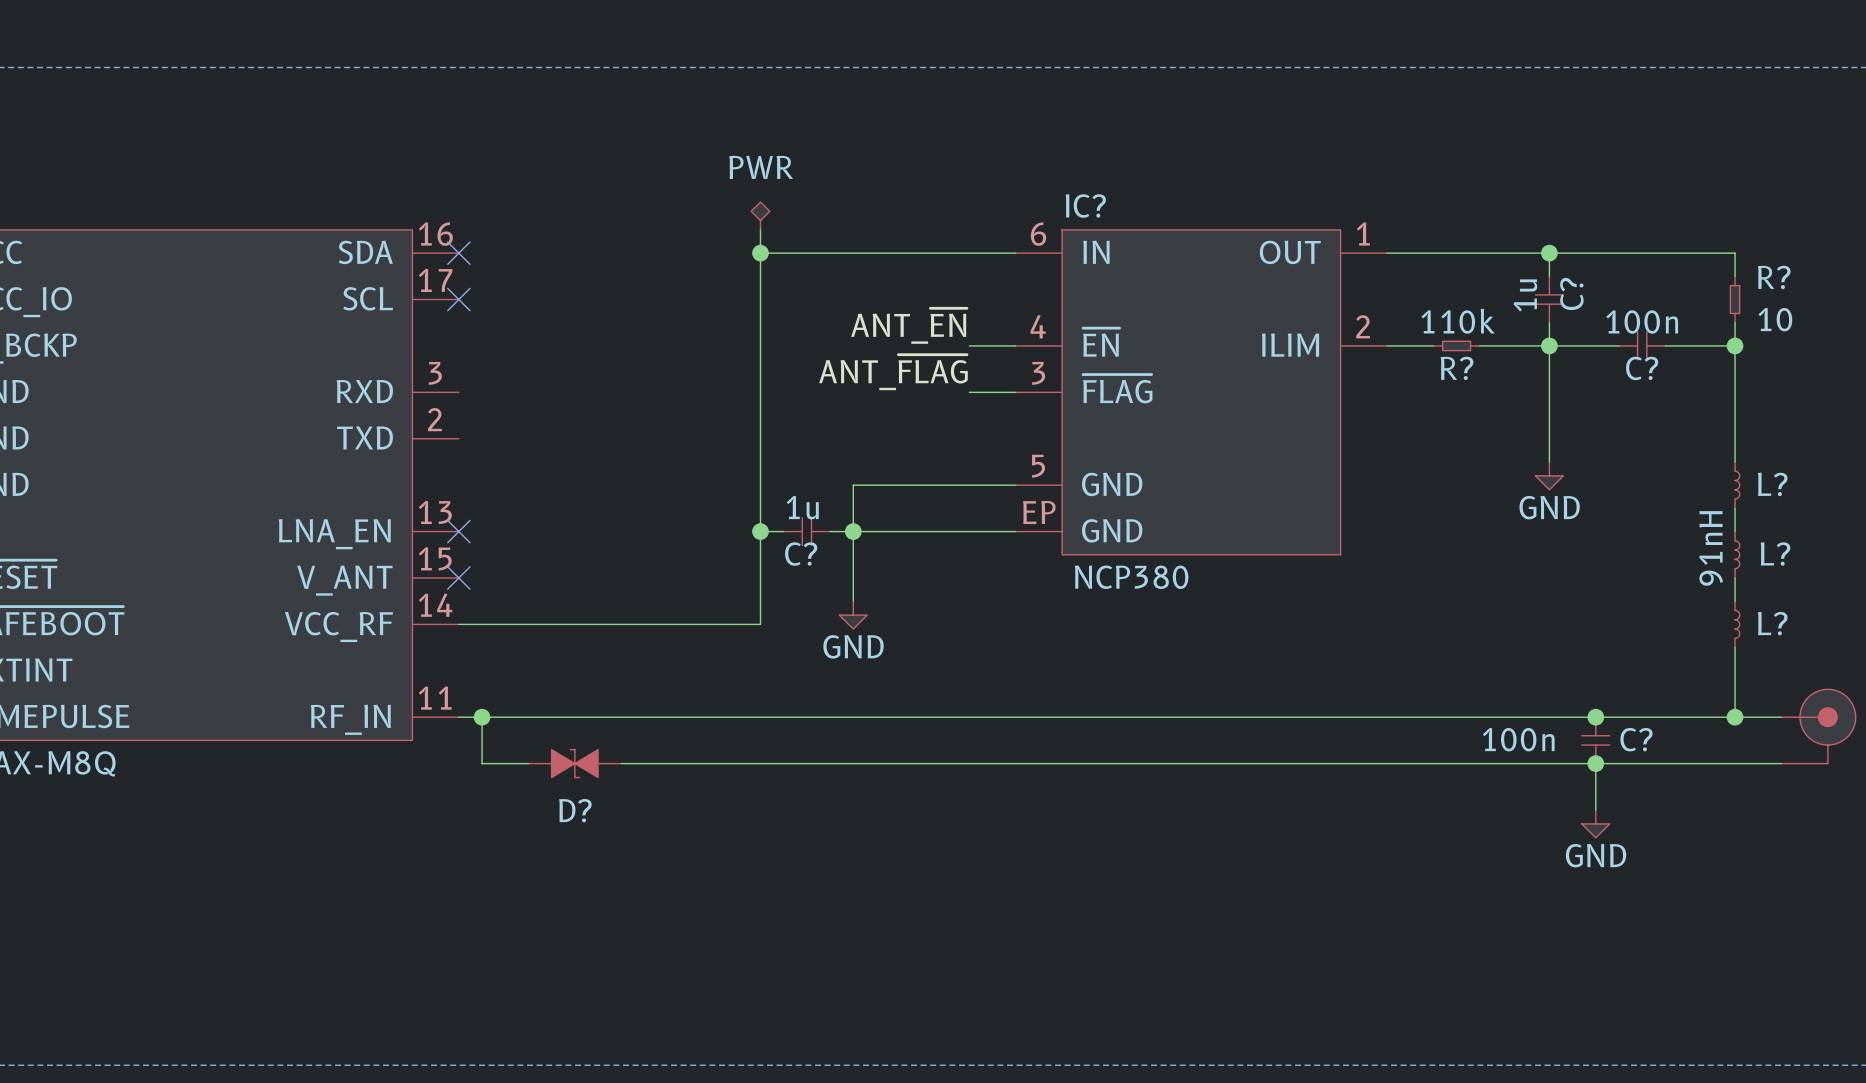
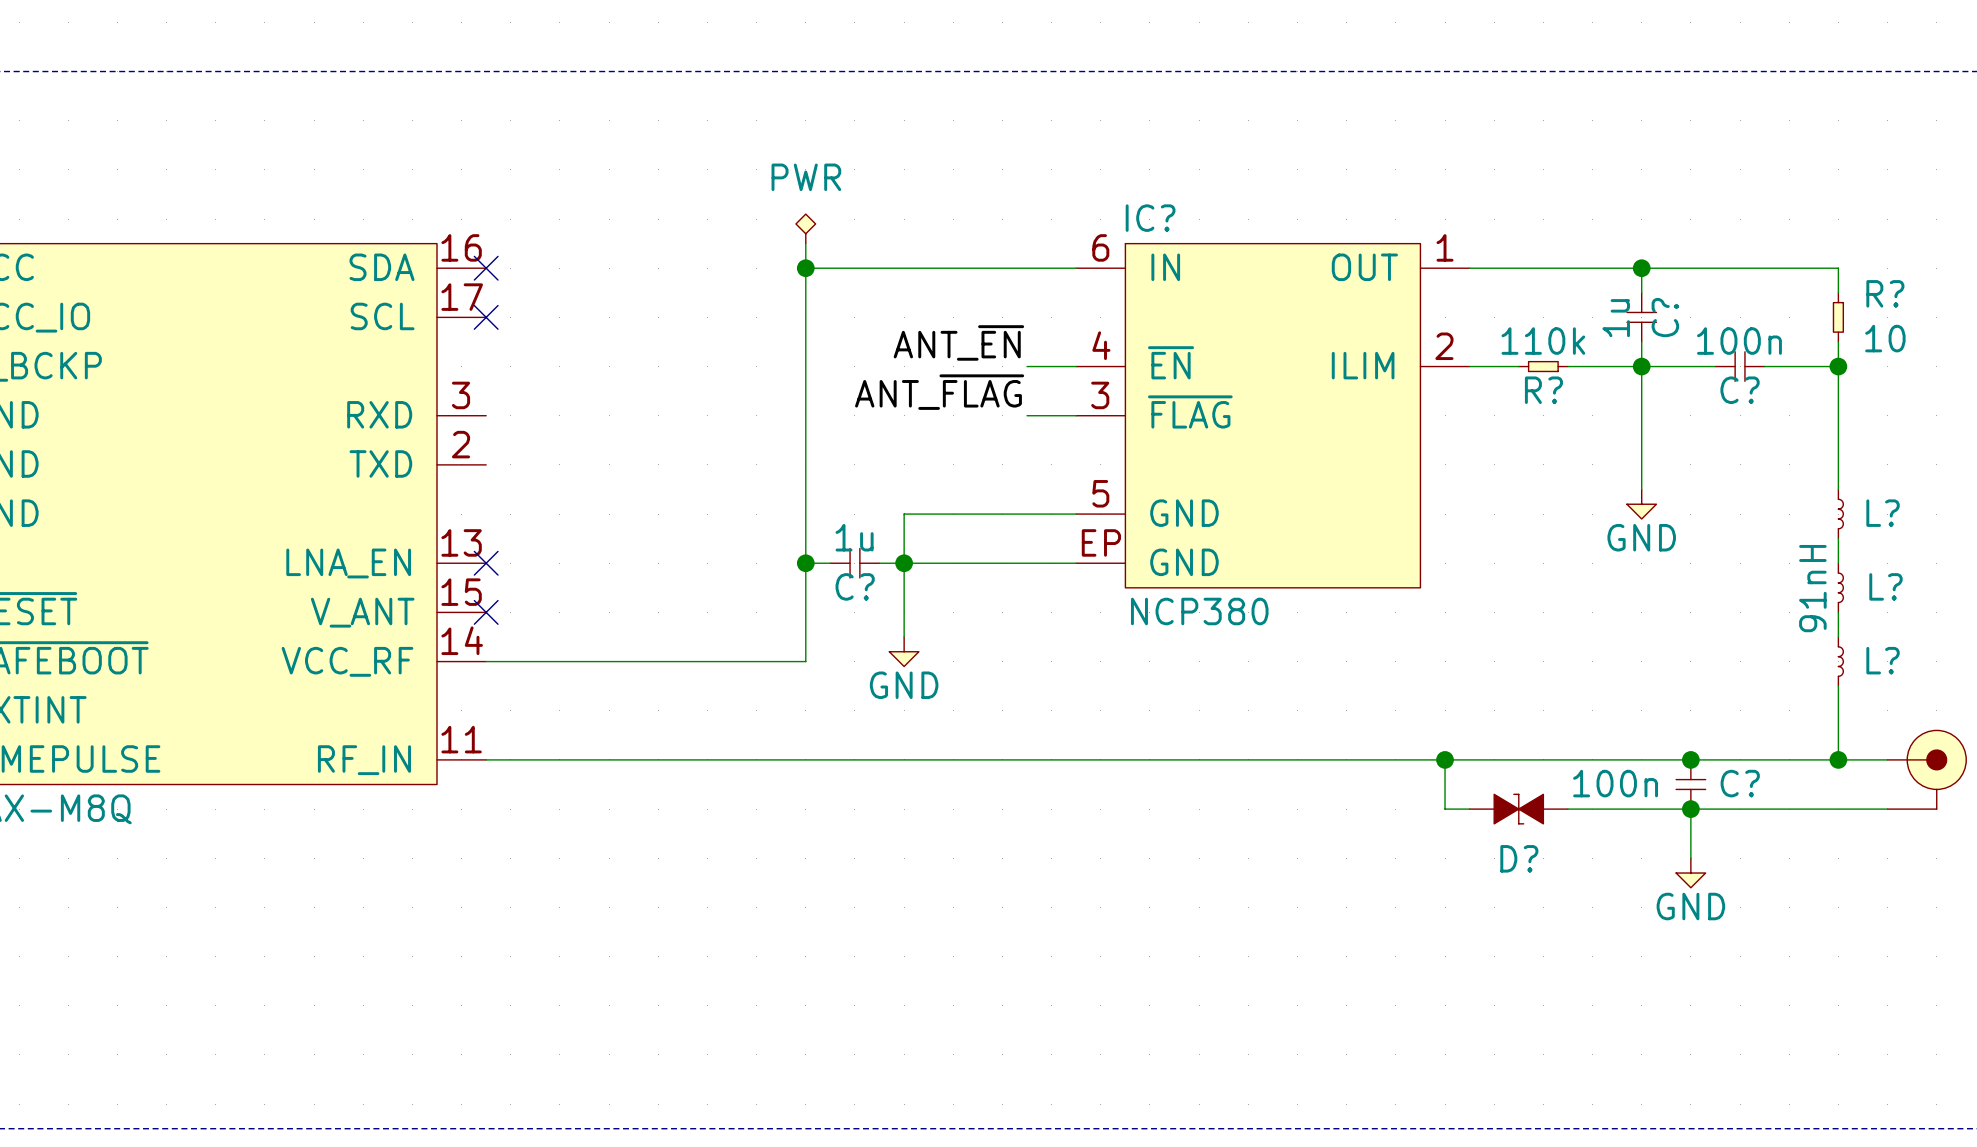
wire: (482, 717) (482, 763) (528, 763) -> none
junction: (482, 717) -> none
junction: none -> (1445, 759)
D?: (574, 763) -> none
wire: (621, 763) (1363, 763) -> (1445, 759) (1445, 809)
D?: none -> (1518, 809)

